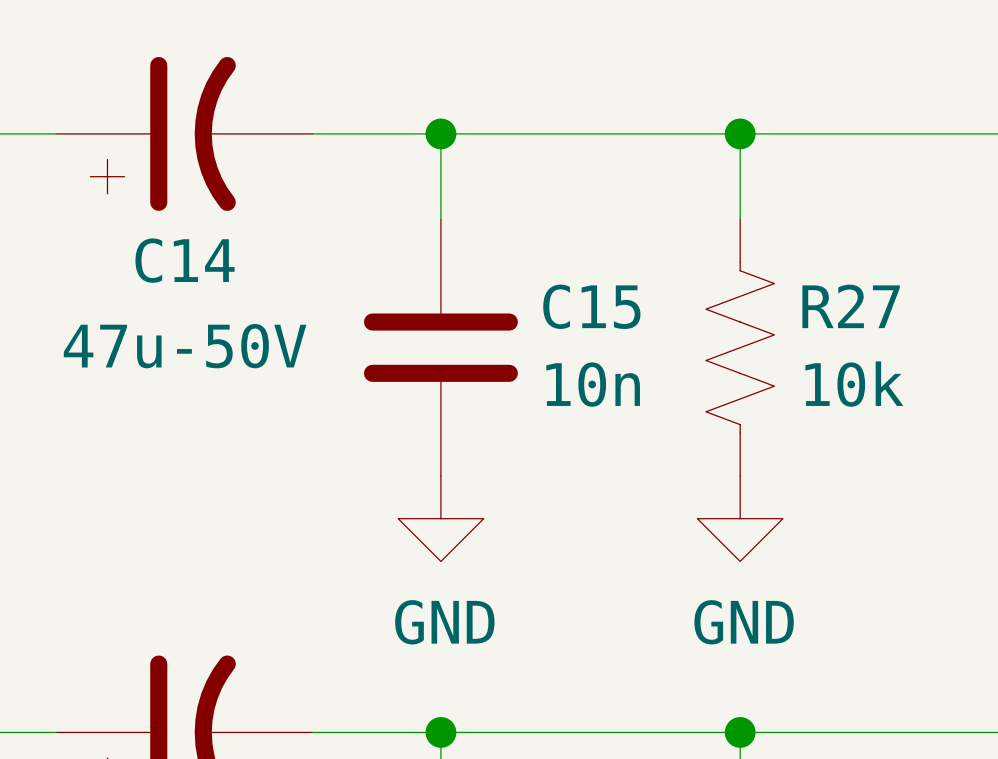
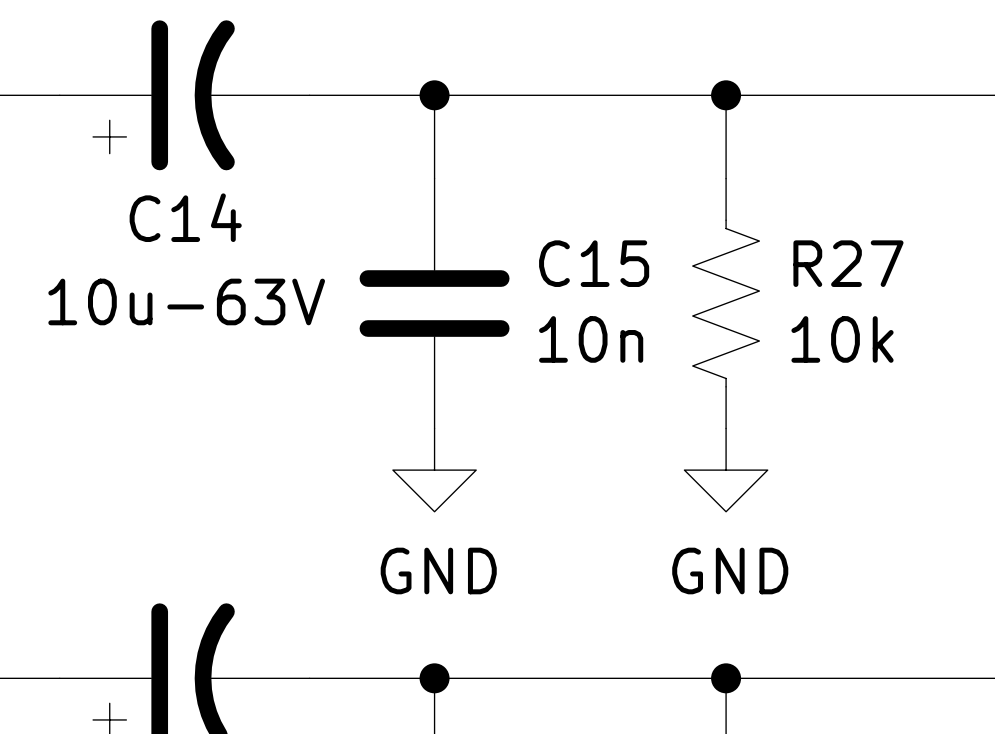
C14 value: 47u-50V (185, 346) -> 10u-63V (186, 301)

